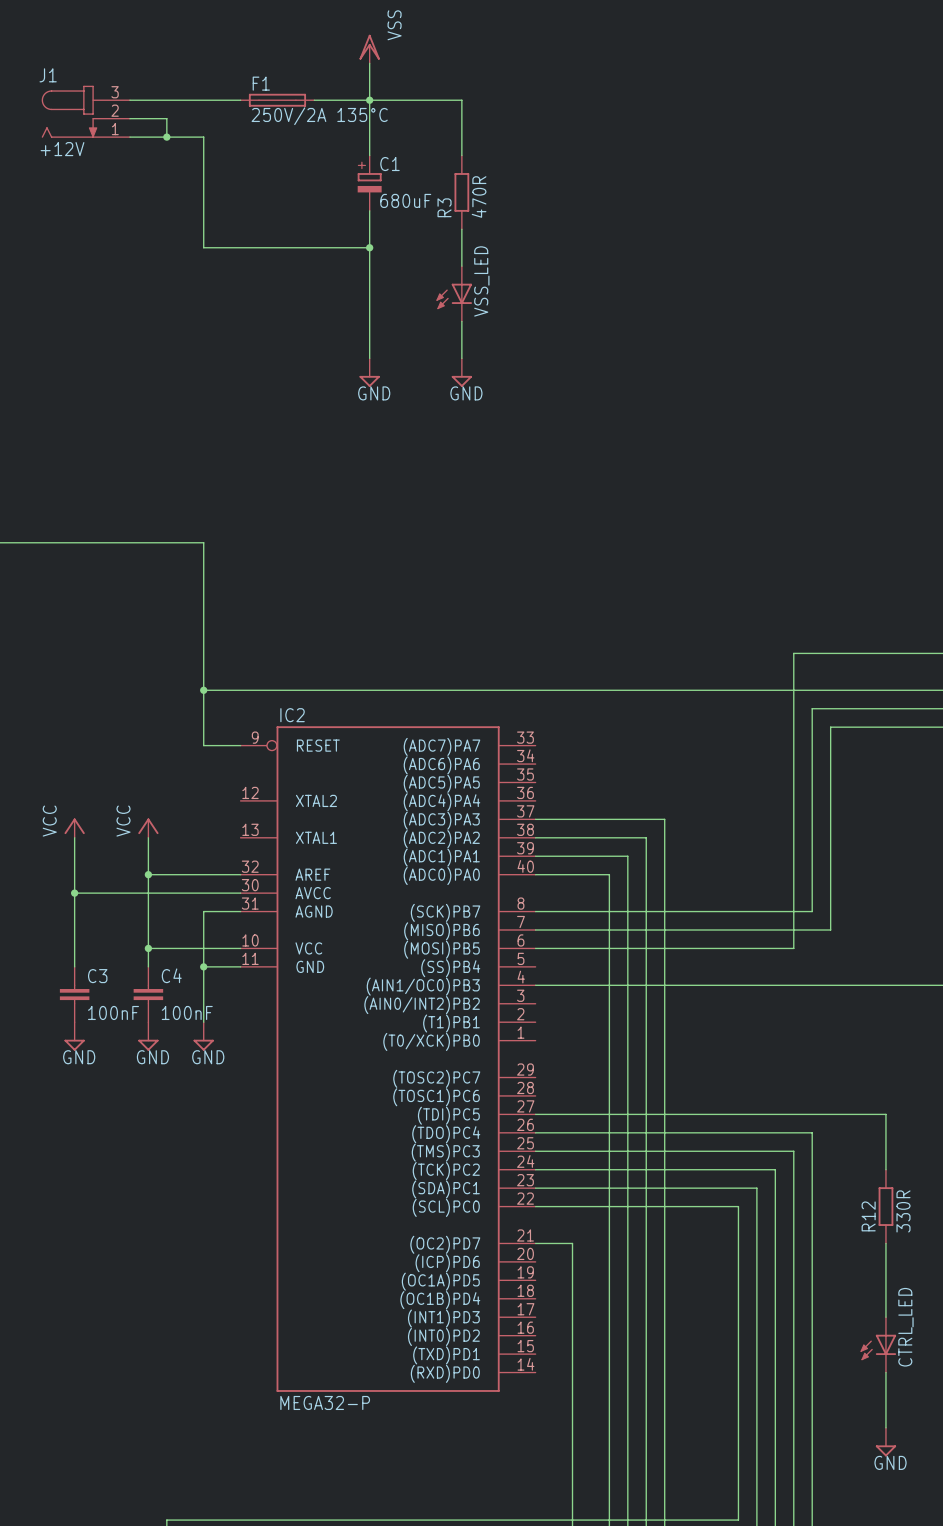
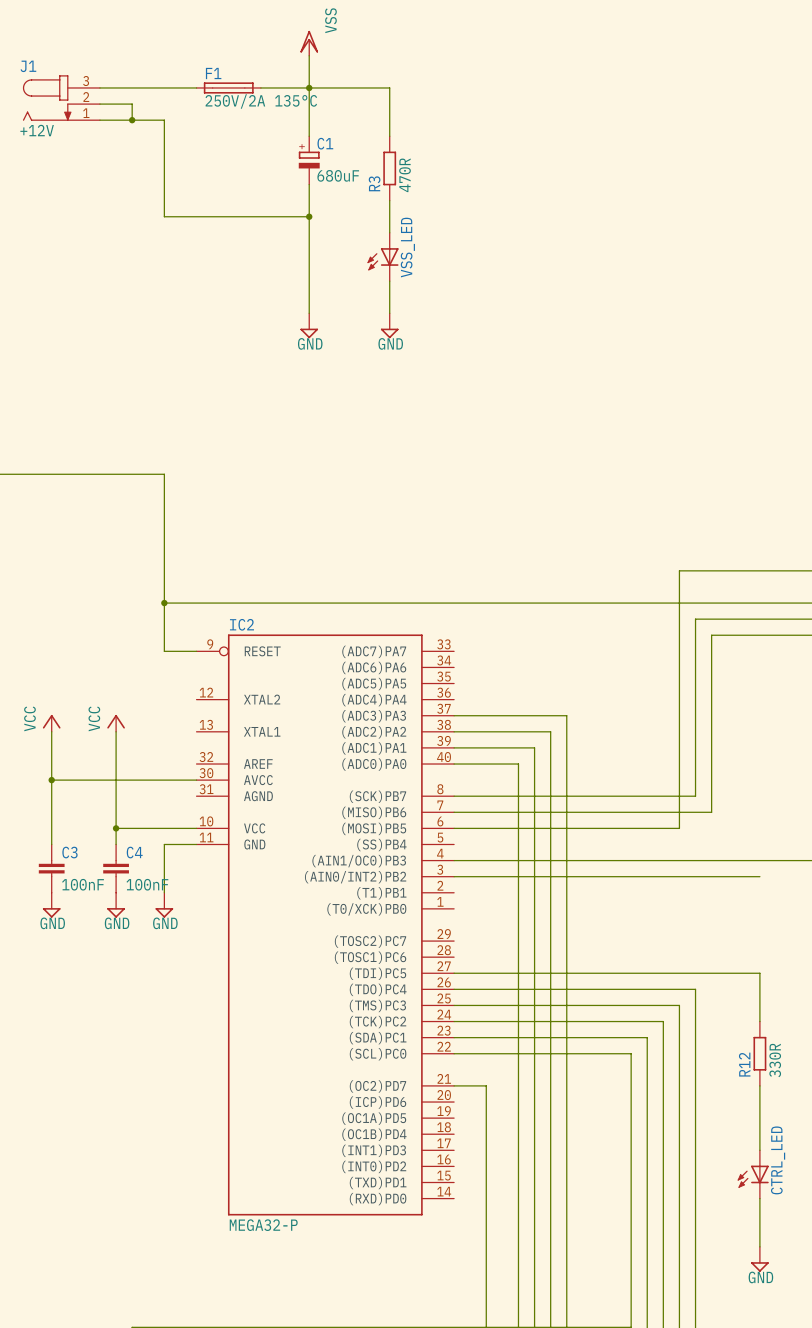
wire: (148, 874) (240, 874) -> none
junction: (148, 874) -> none
wire: (240, 911) (203, 911) (203, 966) -> none
junction: (203, 966) -> none
wire: none -> (454, 876) (759, 876)

